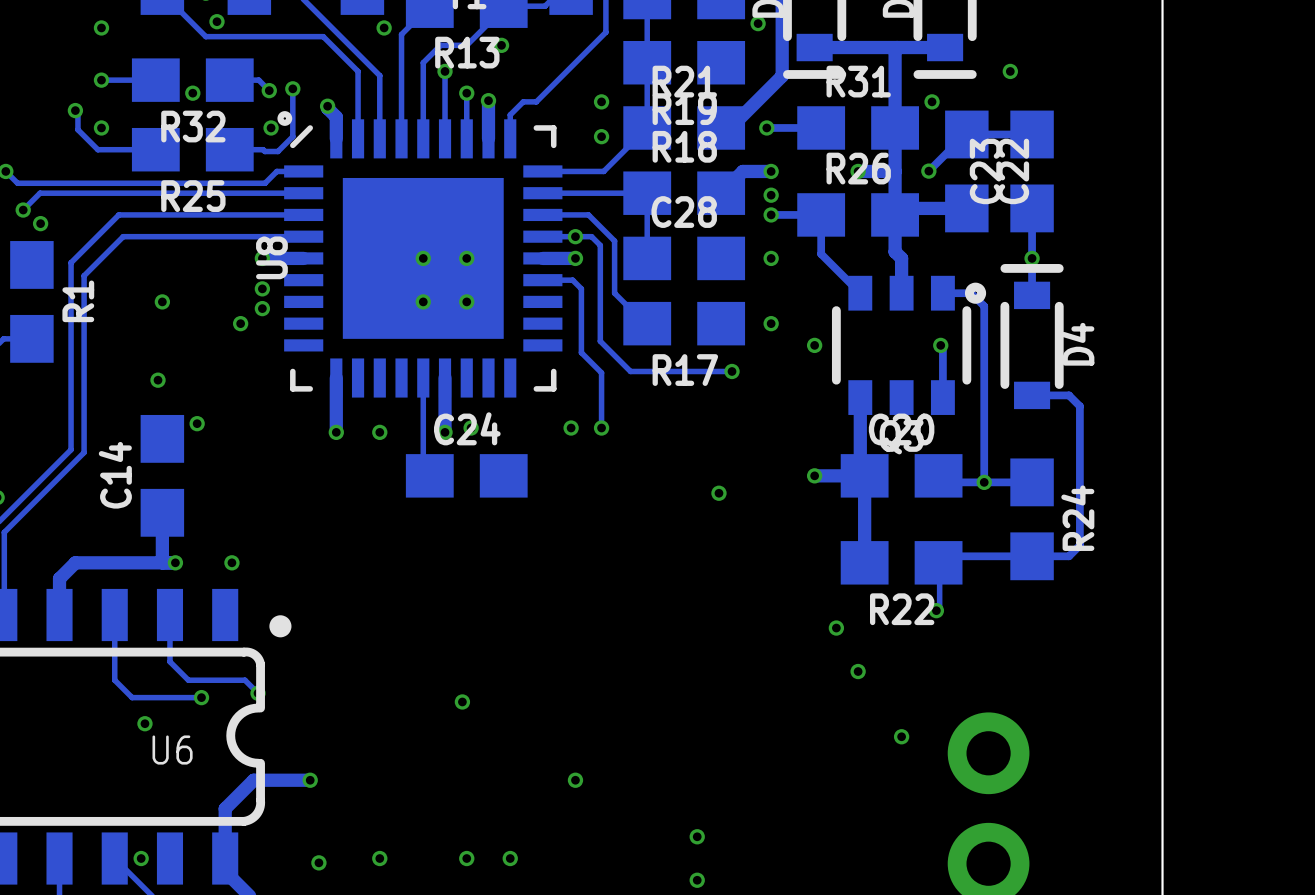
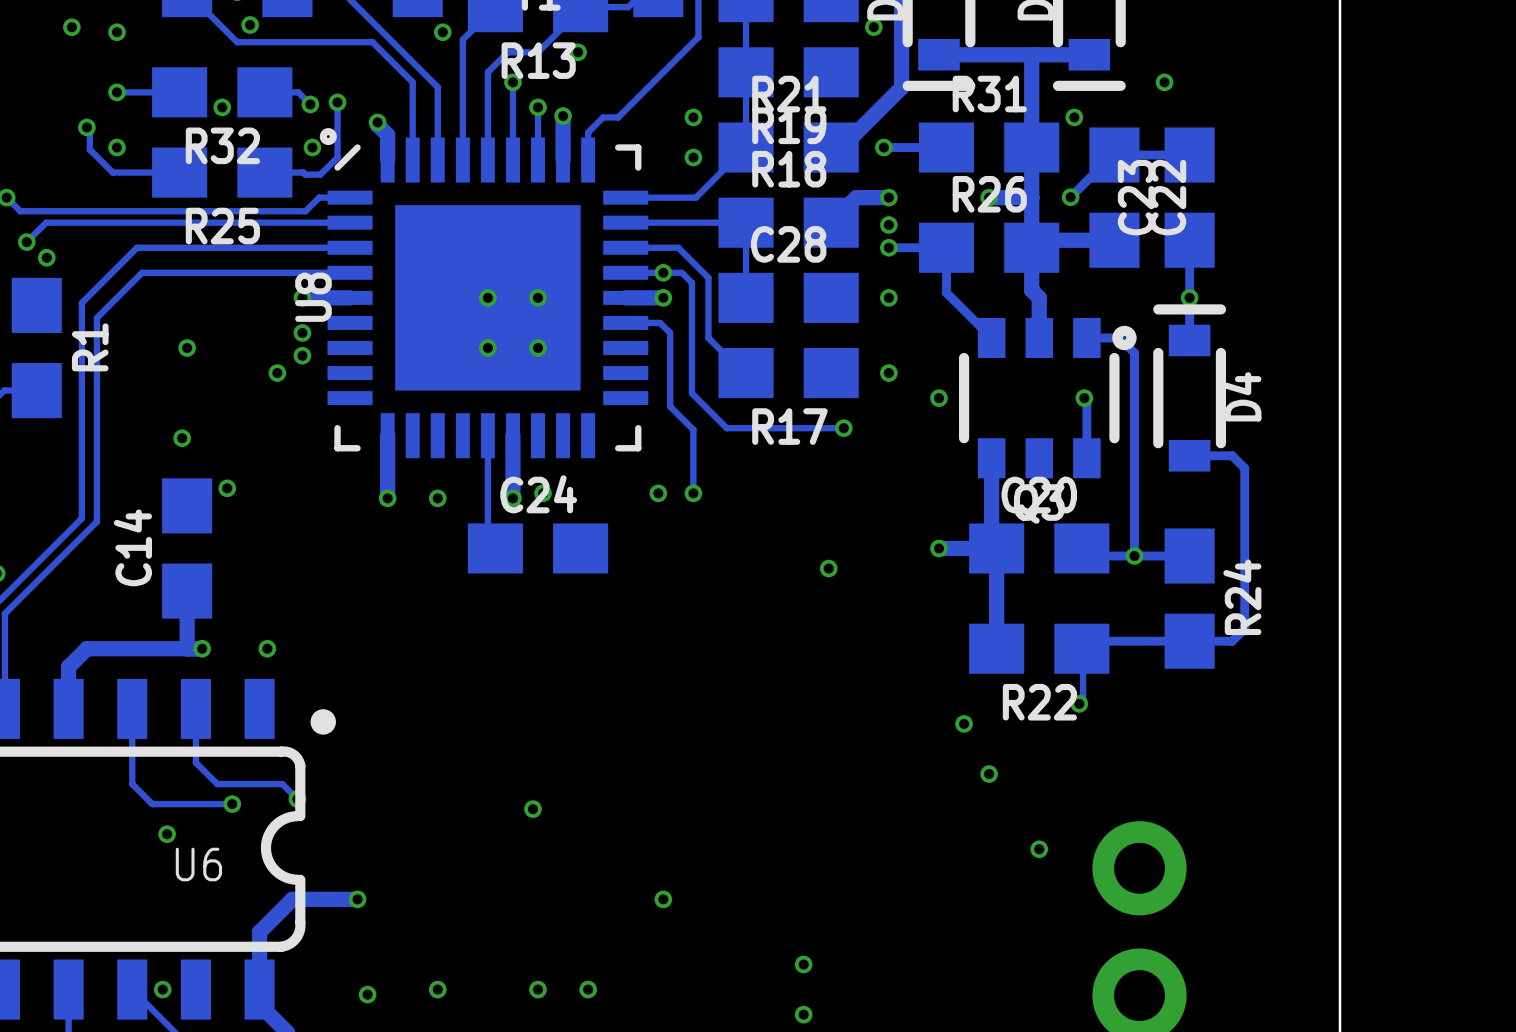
via: none -> (71, 27)

